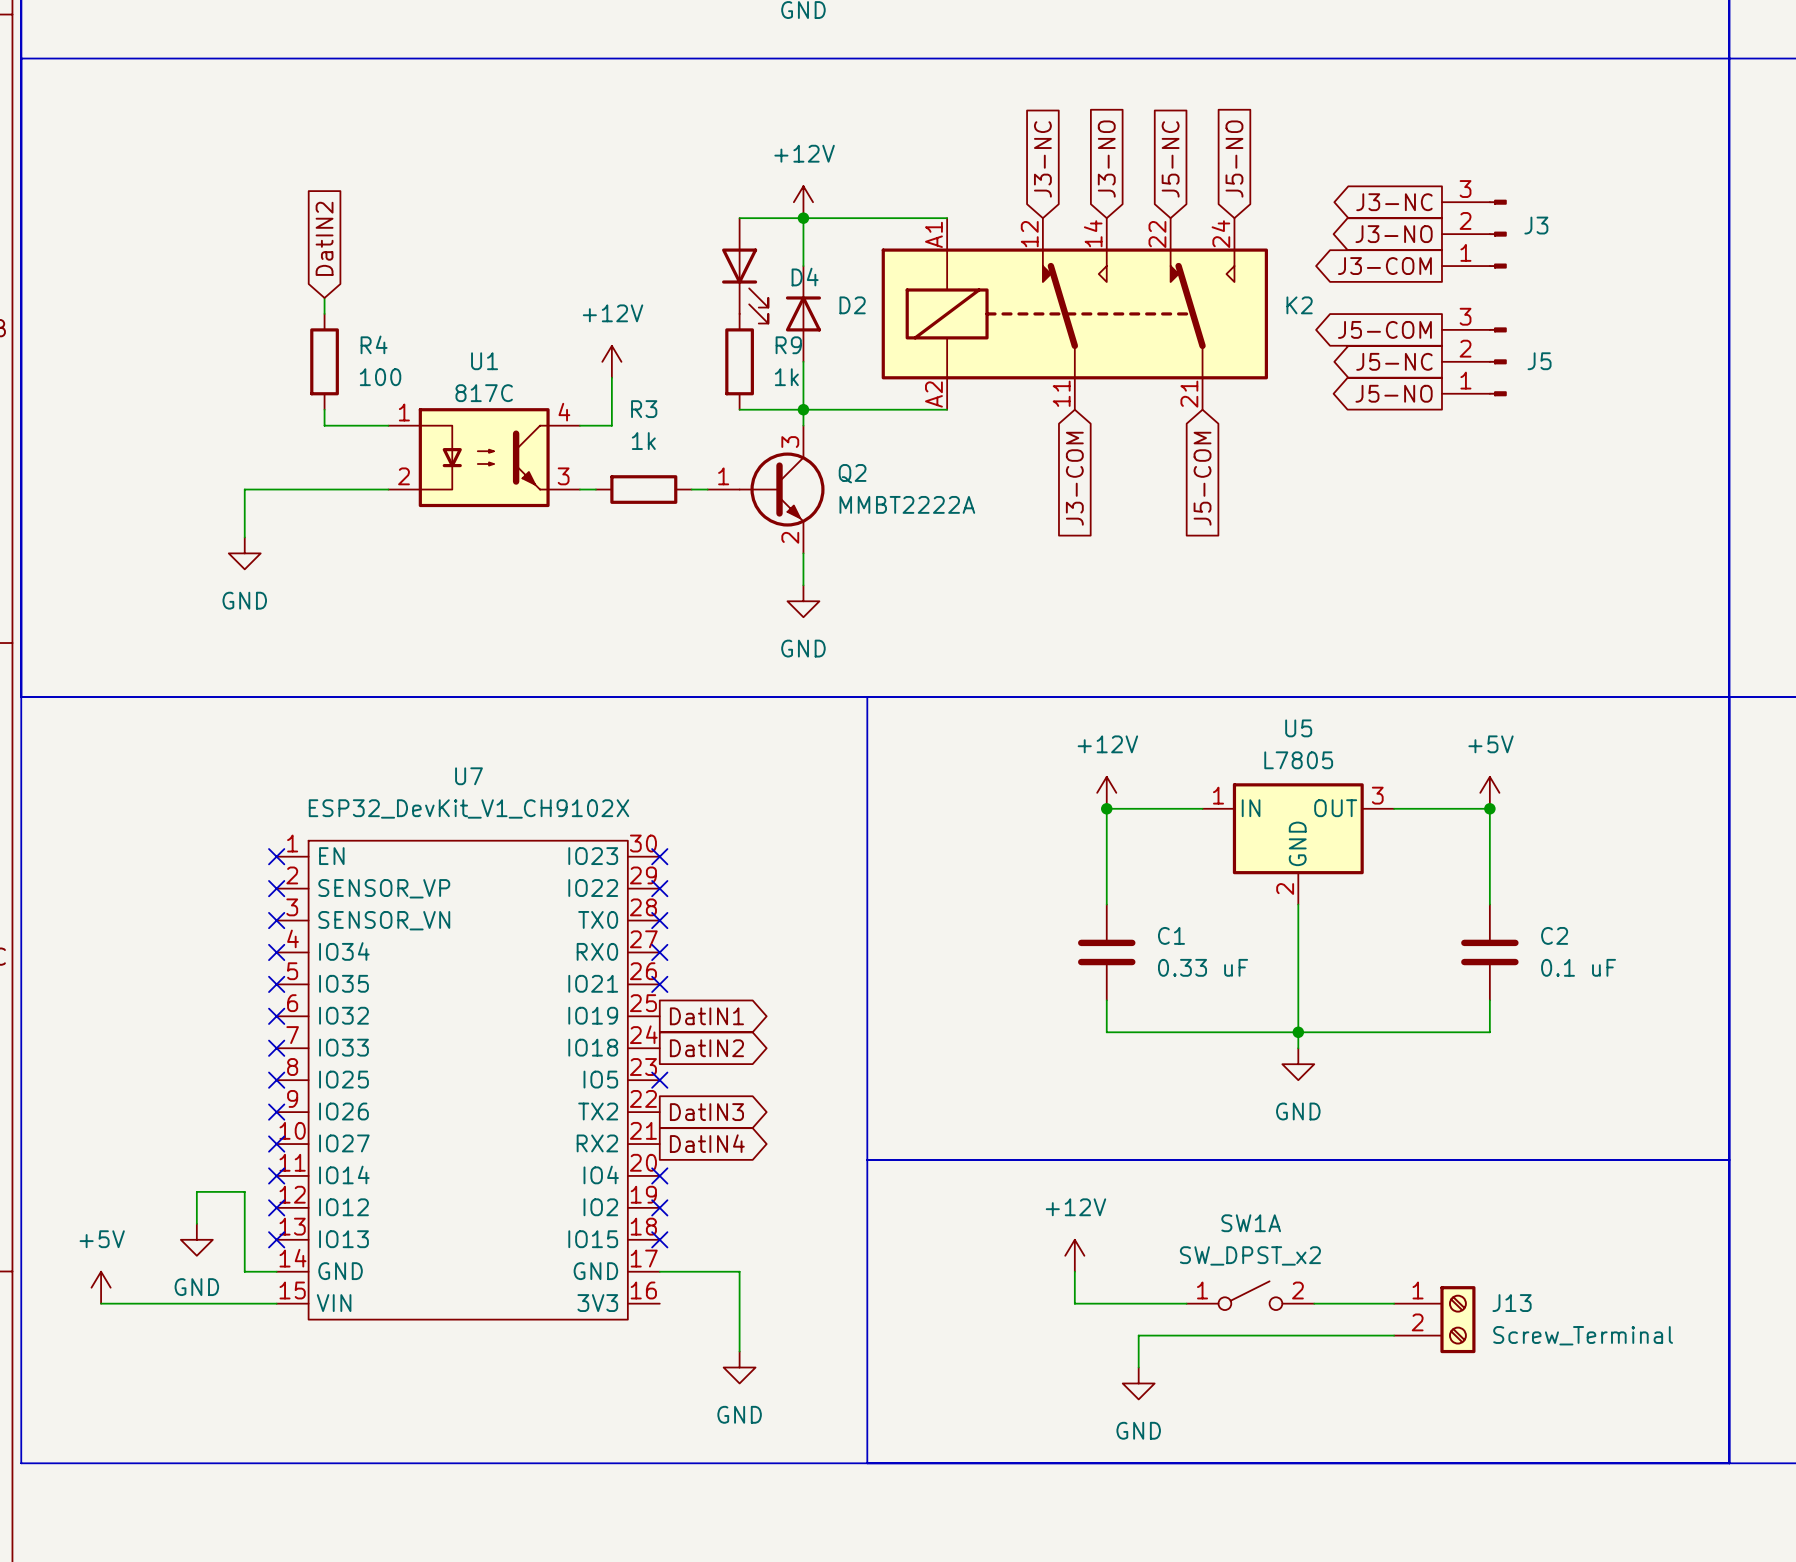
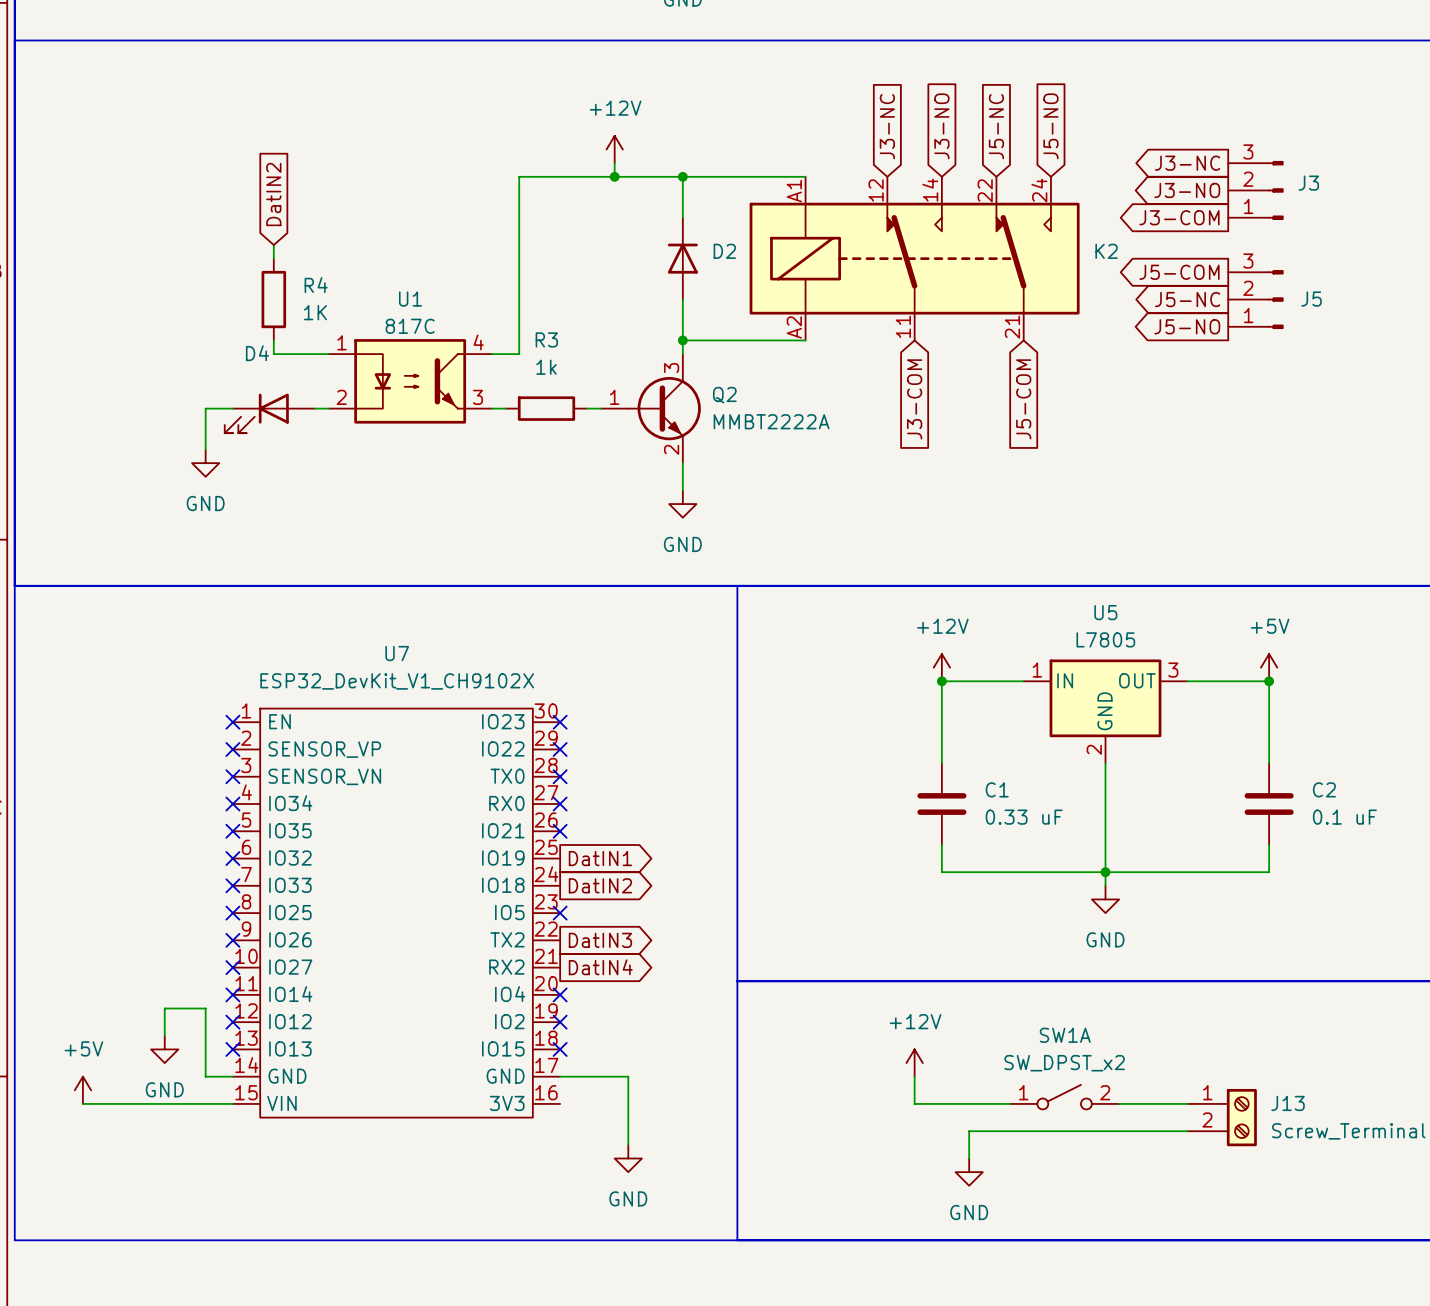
wire: none -> (614, 163) (614, 176)
power symbol position: +12V (803, 202) -> +12V (614, 149)
junction: none -> (614, 176)
wire: none -> (628, 176) (519, 176) (519, 313)
D4 position: (745, 270) -> (269, 413)
D4 name position: D4 (805, 277) -> D4 (257, 353)
D4 rotation: 0° (745, 286) -> 90° clockwise (256, 413)
power symbol: +12V (611, 361) -> none
R9: 1k (739, 361) -> none
R4 value: 100 (380, 377) -> 1K (315, 312)
wire: (739, 409) (803, 409) -> none

